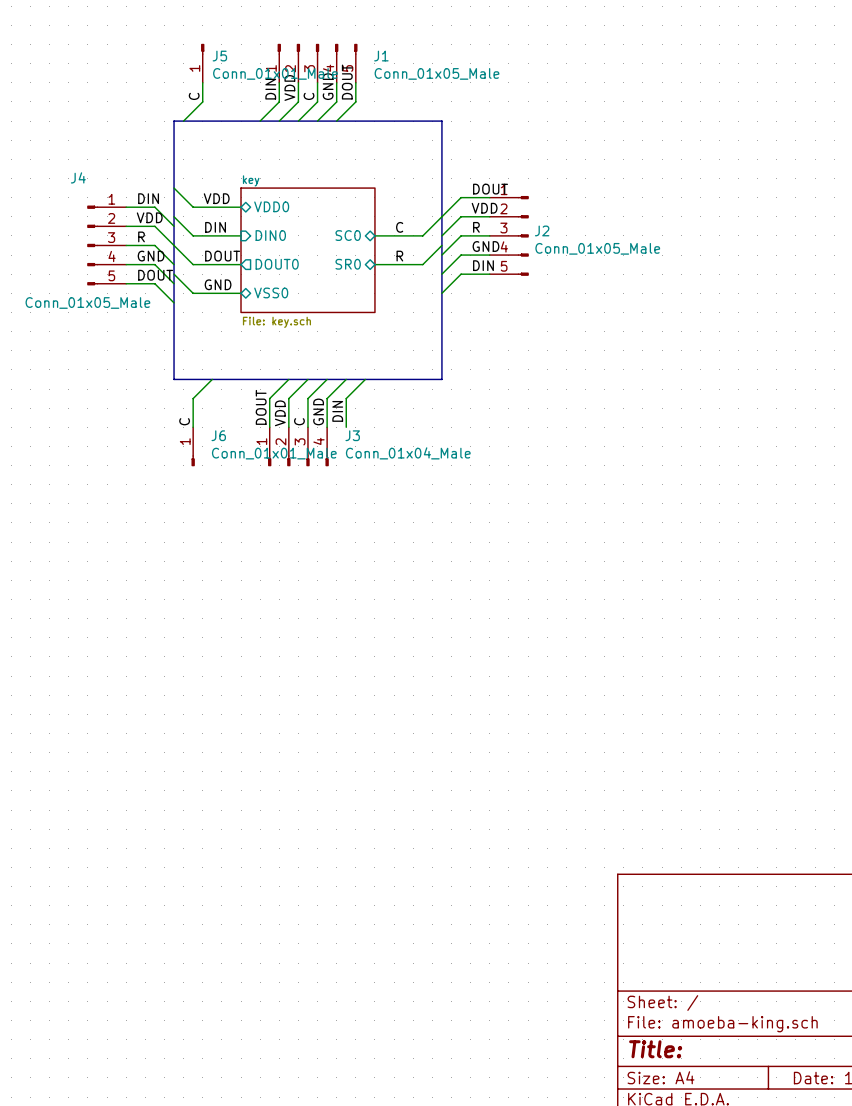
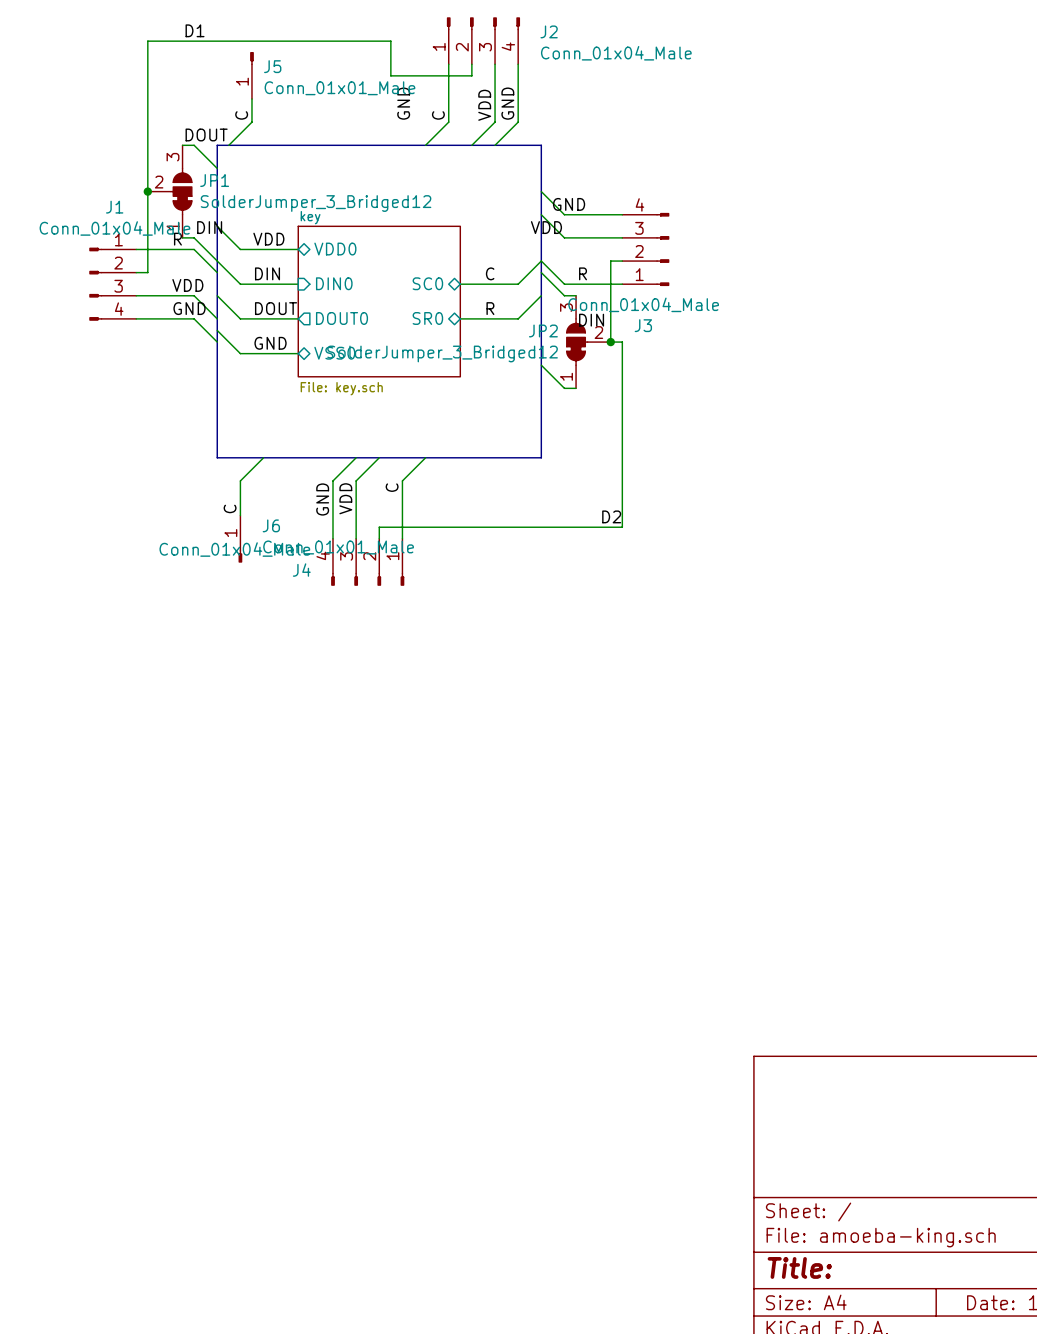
label: none -> D1 (195, 30)
J1 symbol: [277, 43, 358, 83] -> [89, 247, 137, 321]
wire: none -> (448, 64) (448, 122) (425, 145)
wire: none -> (471, 64) (471, 75) (390, 75) (390, 41) (147, 41) (147, 272) (136, 272)
wire: none -> (495, 64) (495, 122) (471, 145)
wire: none -> (518, 64) (518, 122) (495, 145)
J1 name position: J1 (381, 56) -> J1 (114, 207)
J1 value: Conn_01x05_Male (436, 73) -> Conn_01x04_Male (114, 228)
wire: (279, 82) (279, 101) (260, 121) -> none
wire: (298, 82) (298, 101) (279, 121) -> none
wire: (317, 82) (317, 101) (298, 121) -> none
wire: (336, 82) (336, 101) (317, 121) -> none
label: DOUT (347, 82) -> none
wire: (355, 82) (355, 101) (336, 121) -> none
label: none -> GND (507, 103)
label: VDD (289, 87) -> none
label: none -> VDD (484, 105)
label: DIN (270, 89) -> none
label position: C (309, 96) -> C (438, 115)
label: none -> DOUT (206, 134)
wire: none -> (182, 145) (194, 145) (217, 168)
junction: none -> (147, 191)
JP1: none -> SolderJumper_3_Bridged12 (169, 191)
wire: none -> (541, 191) (564, 214) (622, 214)
J4 name position: J4 (78, 177) -> J4 (301, 570)
label: none -> DIN (209, 227)
label: DOUT (490, 189) -> none
J2 symbol: [489, 196, 529, 276] -> [446, 17, 521, 65]
wire: none -> (182, 237) (194, 237) (217, 261)
wire: (461, 197) (441, 216) -> (564, 237) (541, 214)
label: DIN (148, 198) -> R (177, 239)
J4 symbol: [87, 205, 127, 286] -> [331, 538, 405, 586]
label position: VDD (484, 208) -> VDD (546, 227)
wire: (489, 216) (461, 216) (441, 235) -> none
wire: none -> (622, 261) (610, 261) (610, 342) (622, 342) (622, 527) (379, 527) (379, 538)
label: VDD (149, 217) -> none
wire: (126, 226) (154, 226) (174, 245) -> none
wire: none -> (541, 272) (564, 295) (576, 295)
J2 name position: J2 (542, 230) -> J2 (549, 31)
wire: (461, 235) (441, 255) -> (564, 284) (541, 261)
label: R (141, 236) -> VDD (187, 285)
label position: GND (485, 246) -> GND (569, 204)
J2 value: Conn_01x05_Male (597, 248) -> Conn_01x04_Male (616, 53)
wire: (489, 255) (461, 255) (441, 274) -> none
wire: (489, 274) (461, 274) (441, 293) -> none
label: DOUT (155, 275) -> none
wire: (126, 283) (154, 283) (174, 302) -> none
JP2: none -> SolderJumper_3_Bridged12 (588, 342)
junction: none -> (610, 342)
J4 value: Conn_01x05_Male (87, 302) -> Conn_01x04_Male (234, 549)
wire: none -> (541, 365) (564, 388) (576, 388)
wire: (327, 379) (307, 398) (307, 427) -> none
wire: (365, 379) (346, 398) (346, 427) -> none
label: DOUT (261, 407) -> none
label position: GND (318, 411) -> GND (322, 499)
label: DIN (337, 411) -> none
label position: C (299, 421) -> C (392, 487)
label: none -> D2 (611, 516)
J3 name position: J3 (352, 435) -> J3 (643, 325)
J3 position: (298, 446) -> (645, 249)
J3 value position: Conn_01x04_Male (408, 453) -> Conn_01x04_Male (643, 304)
J3 rotation: 0° (298, 460) -> 90° counterclockwise (662, 249)

